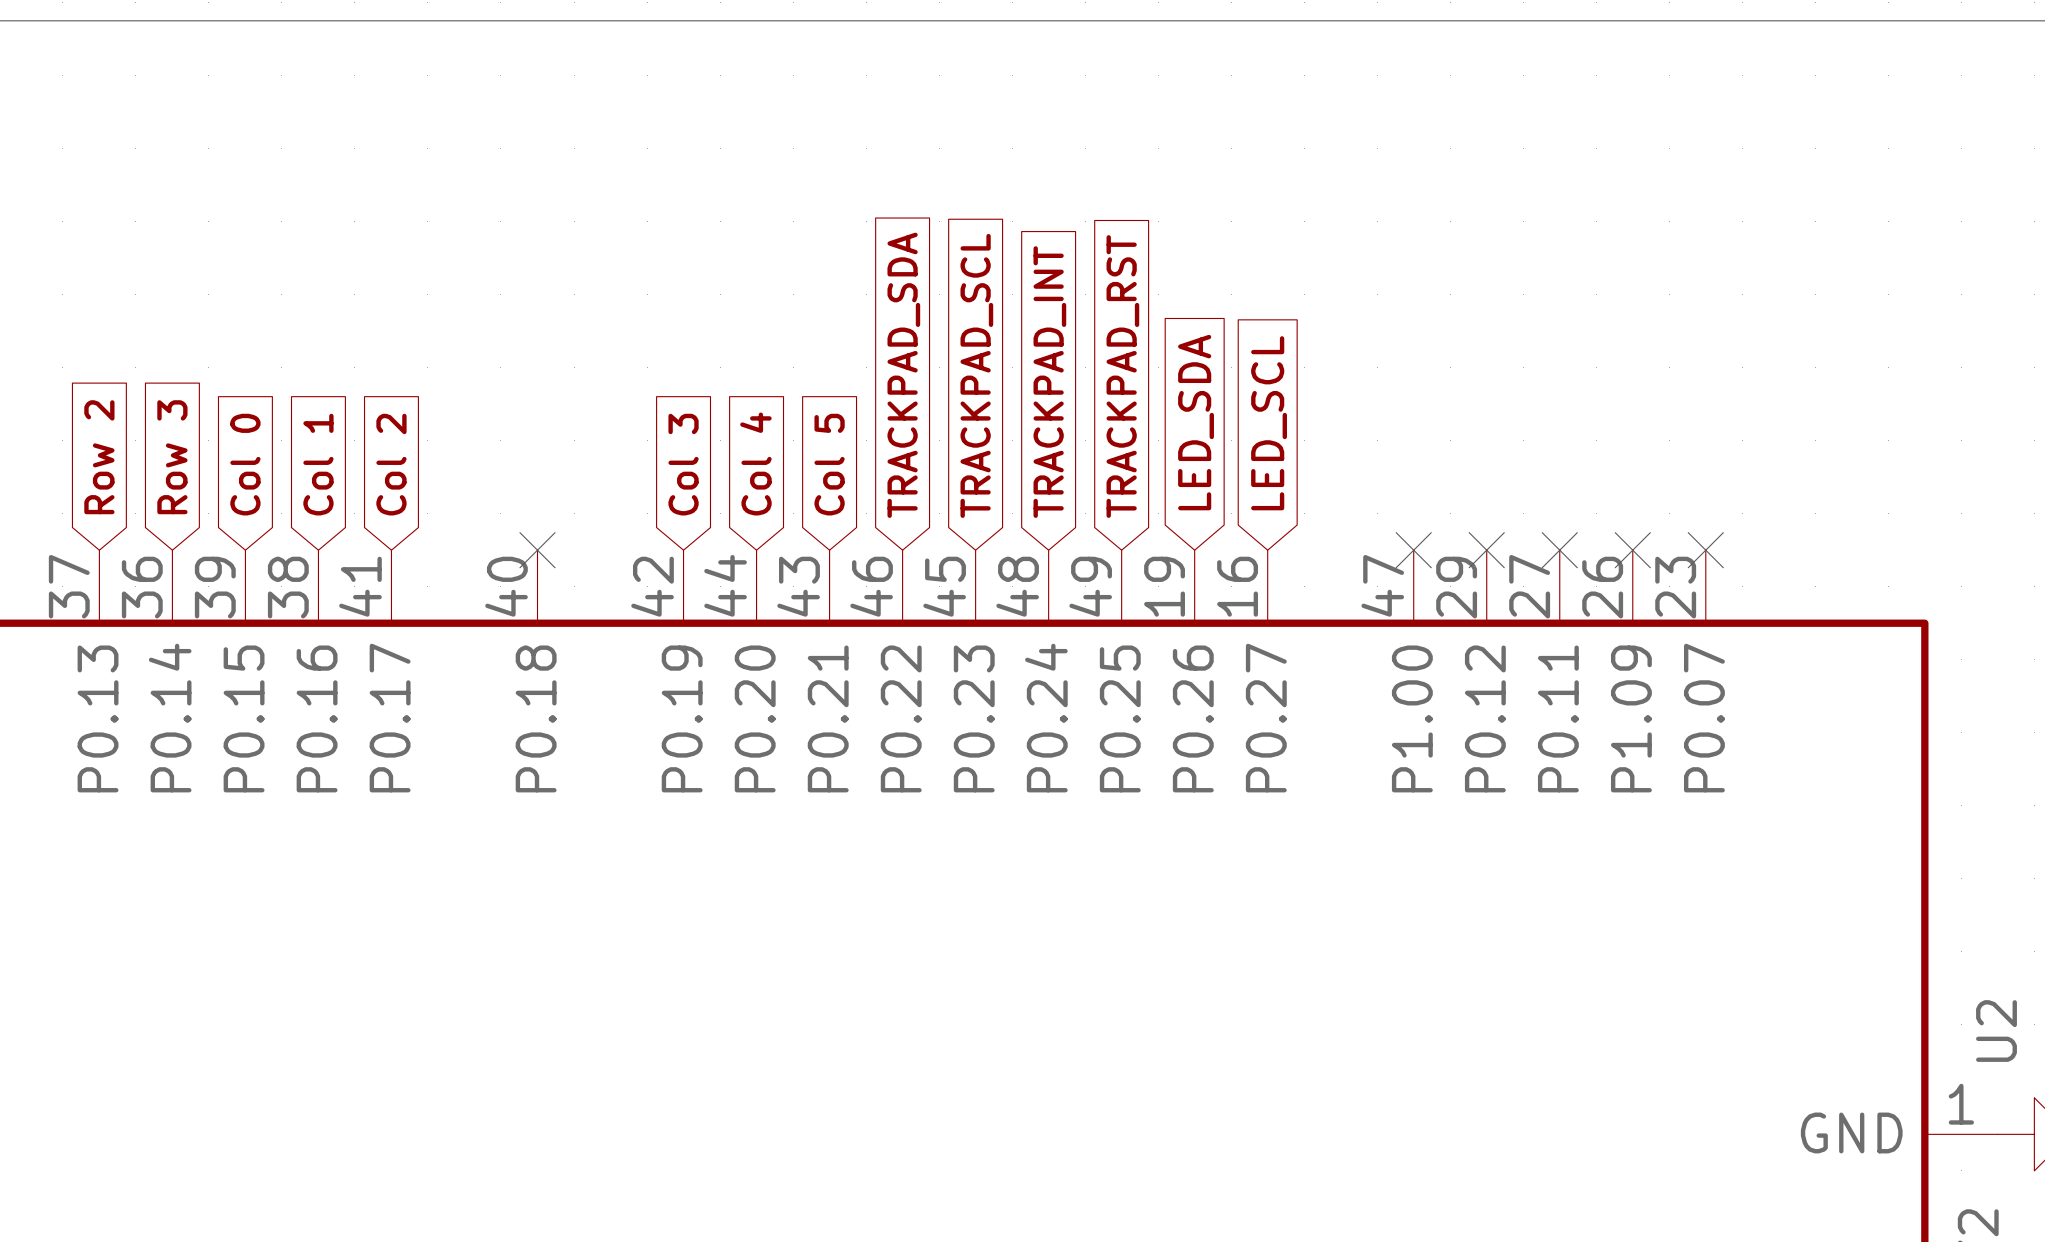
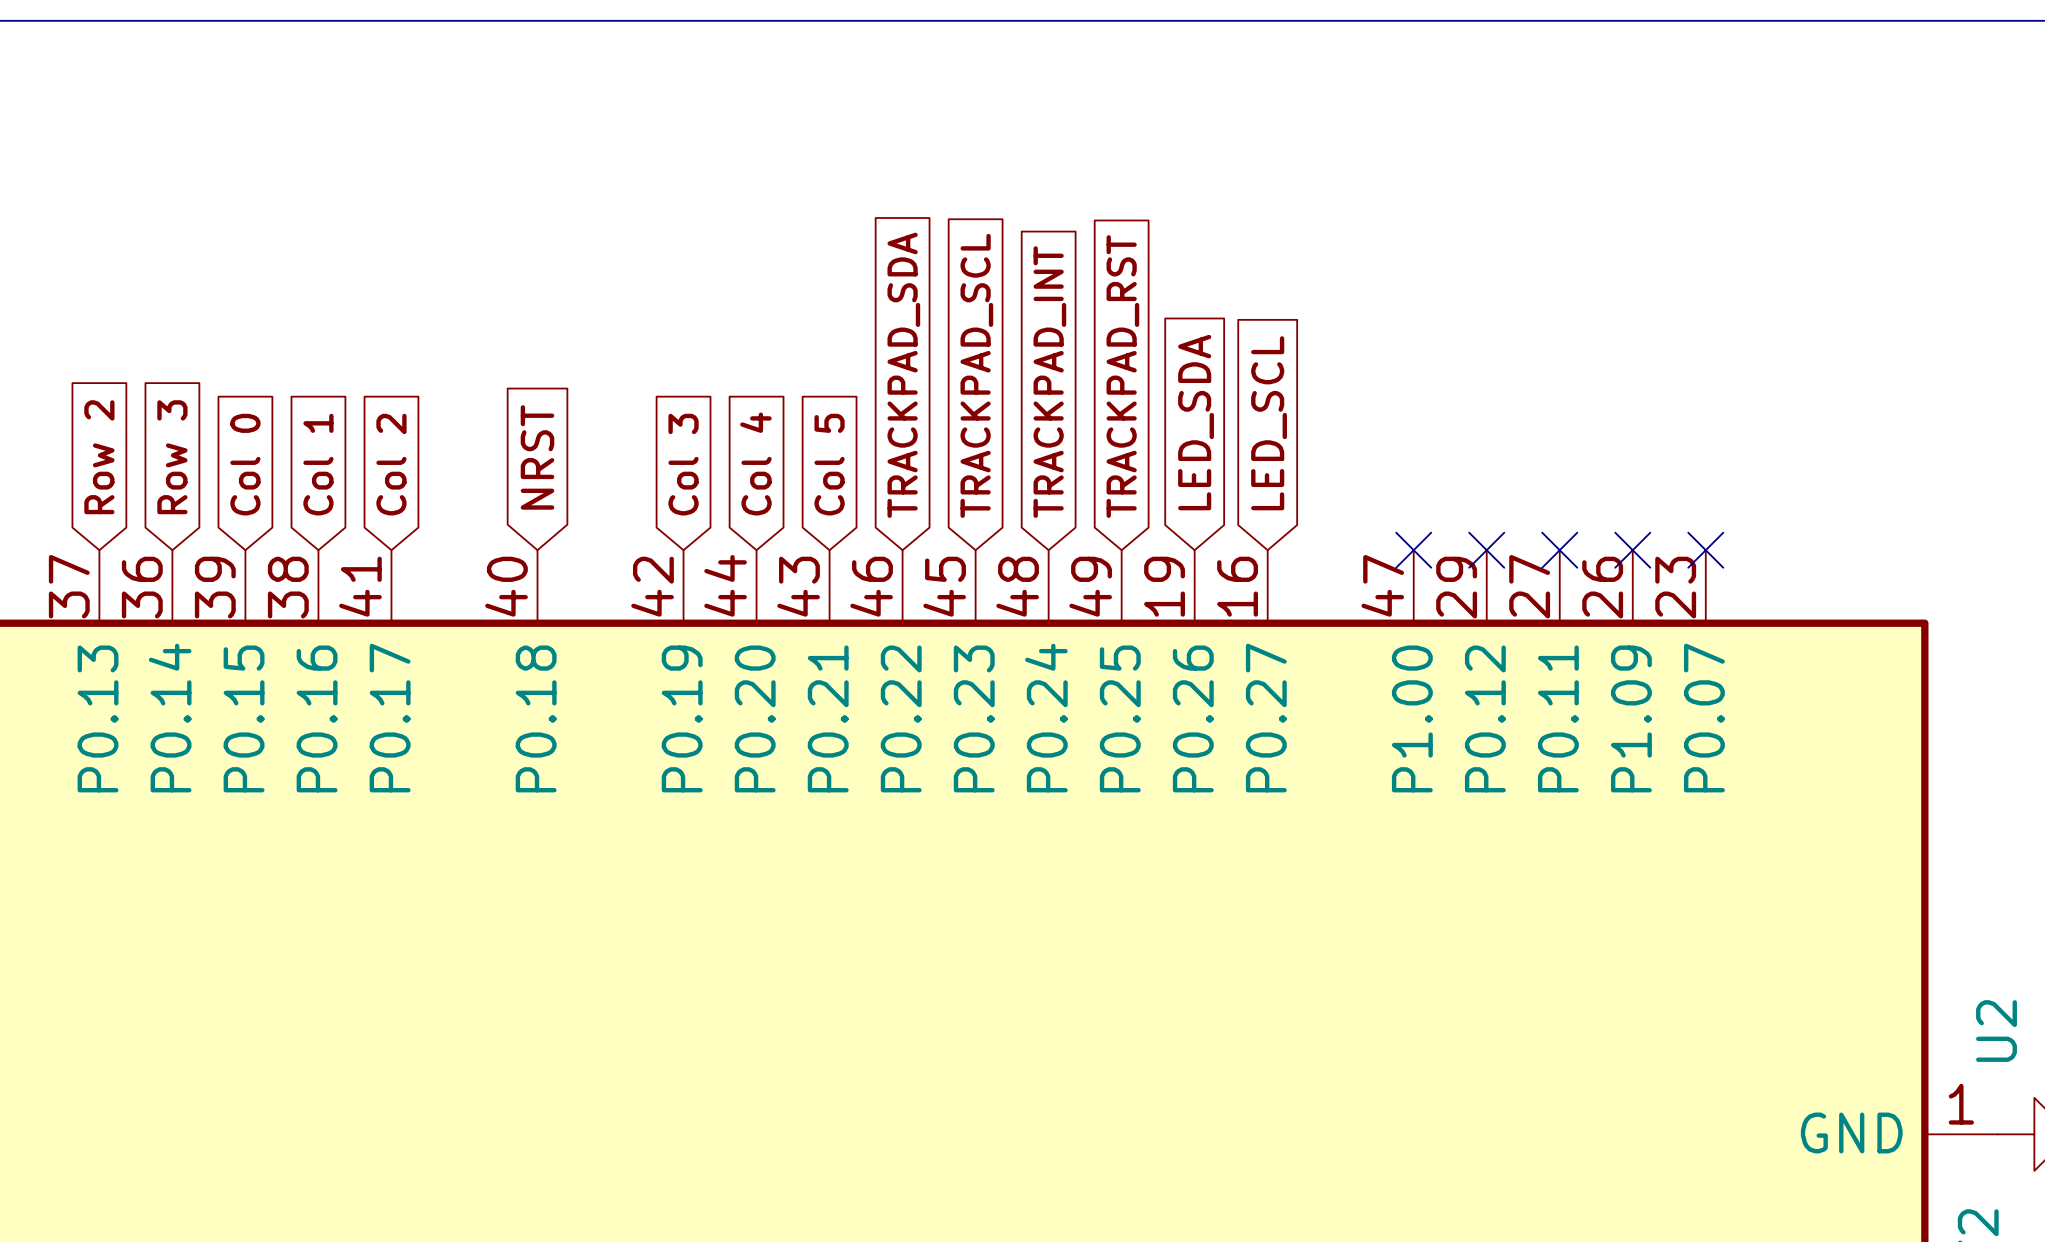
global label: none -> NRST (537, 457)
no-connect mark: (537, 550) -> none

